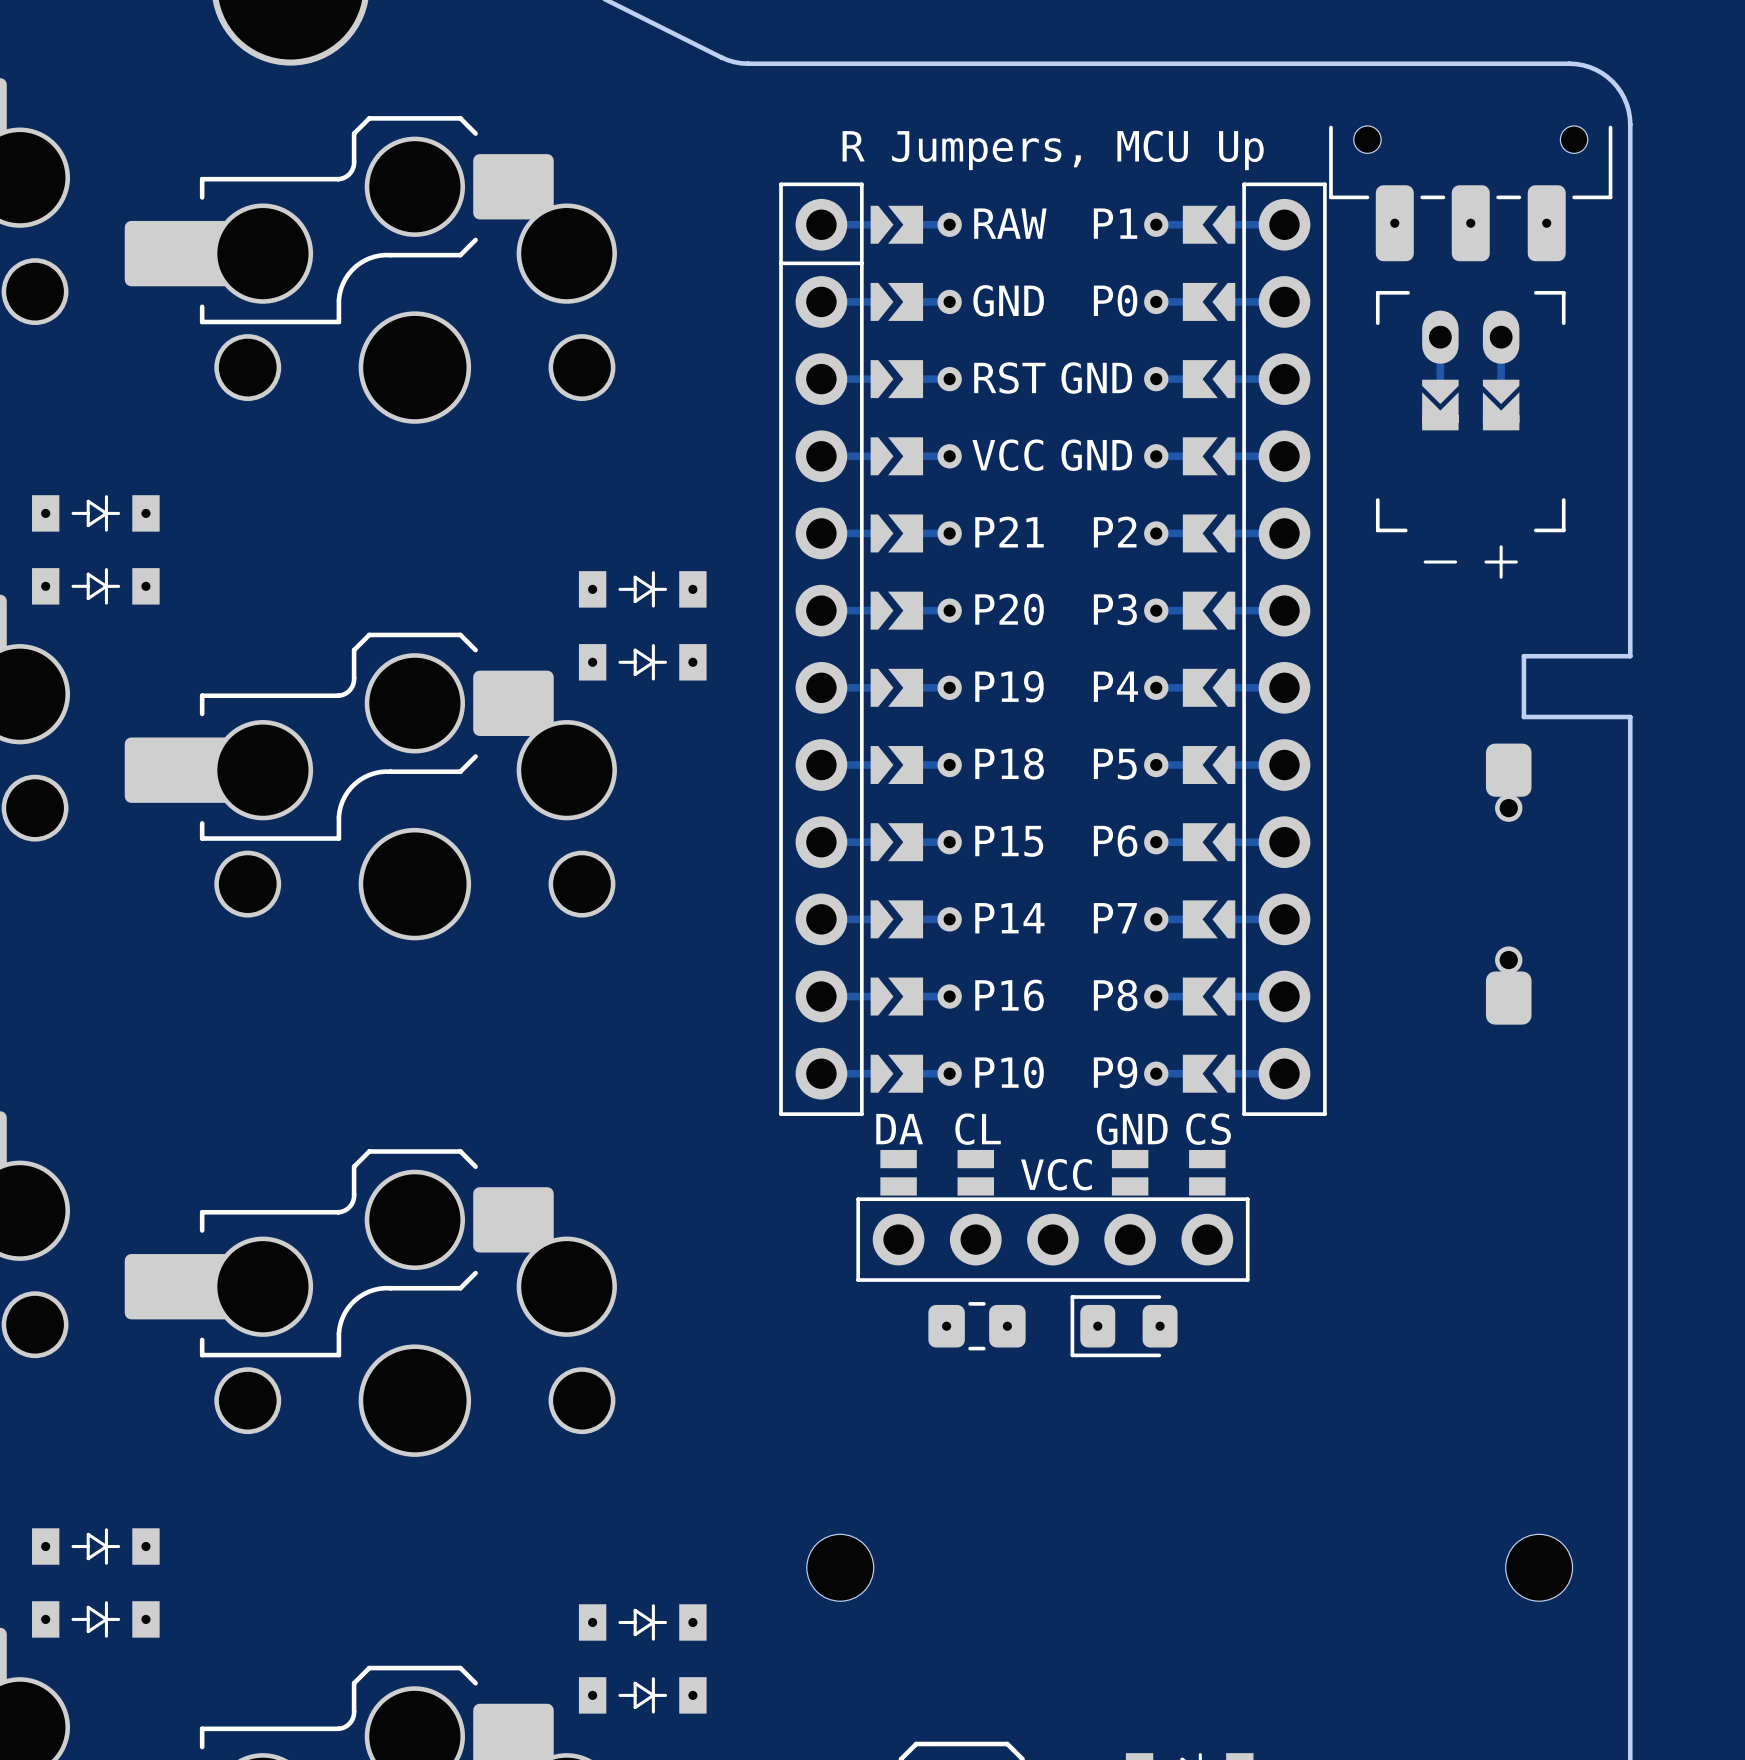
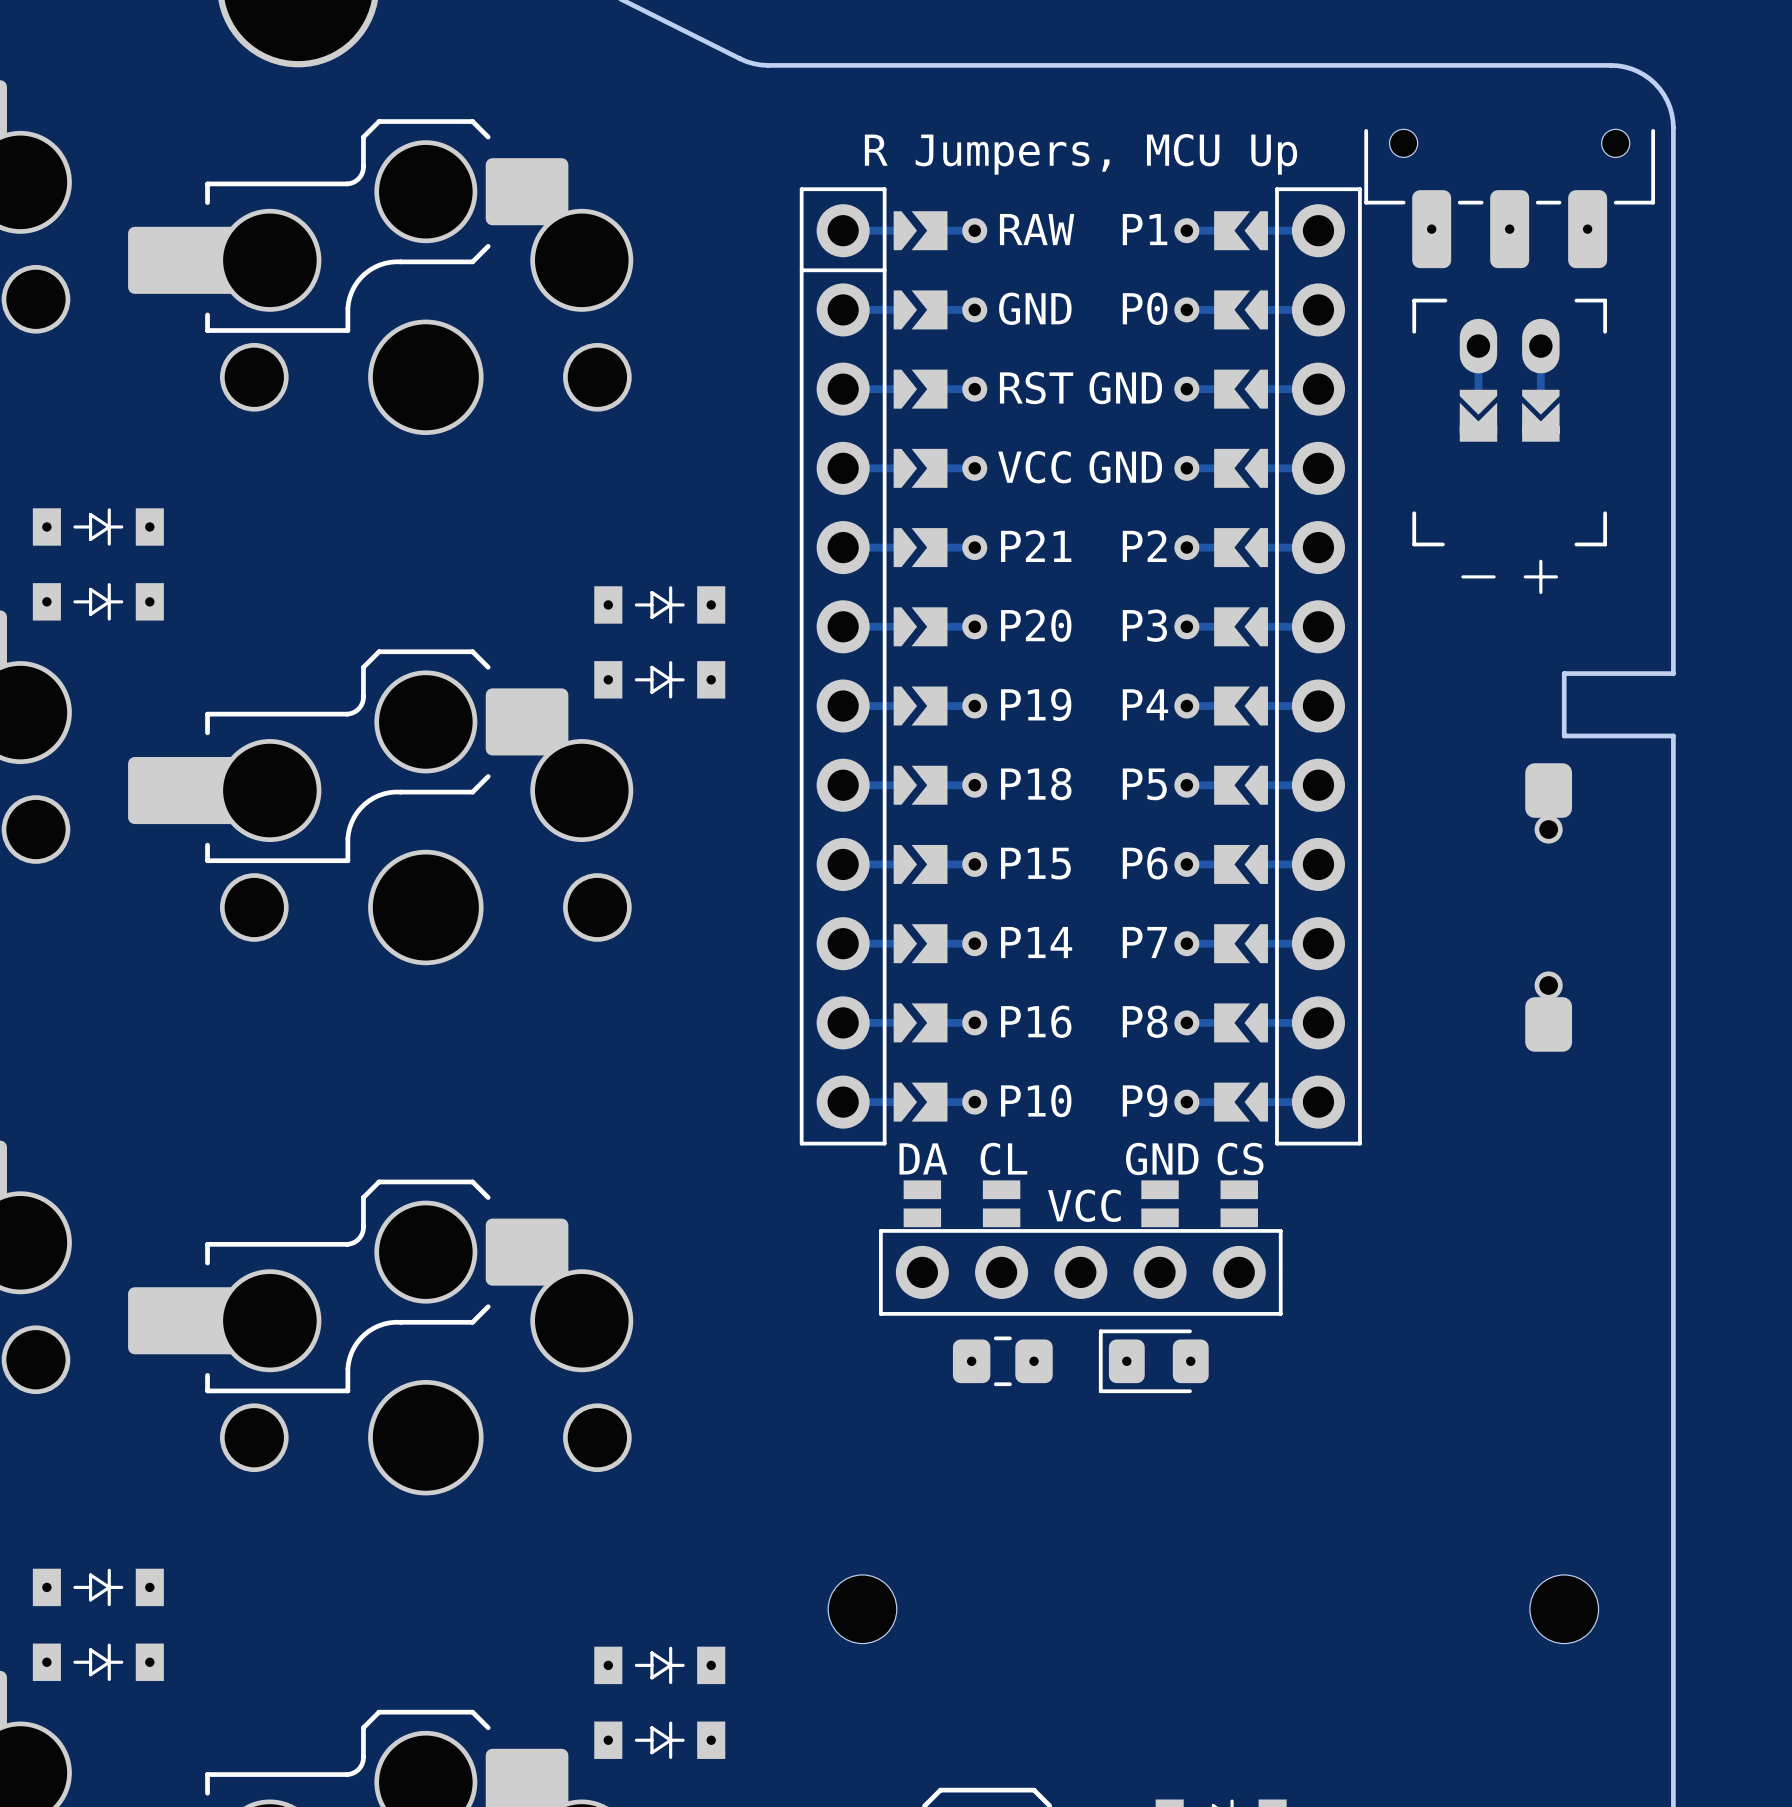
part position: (1539, 1567) -> (1564, 1609)

